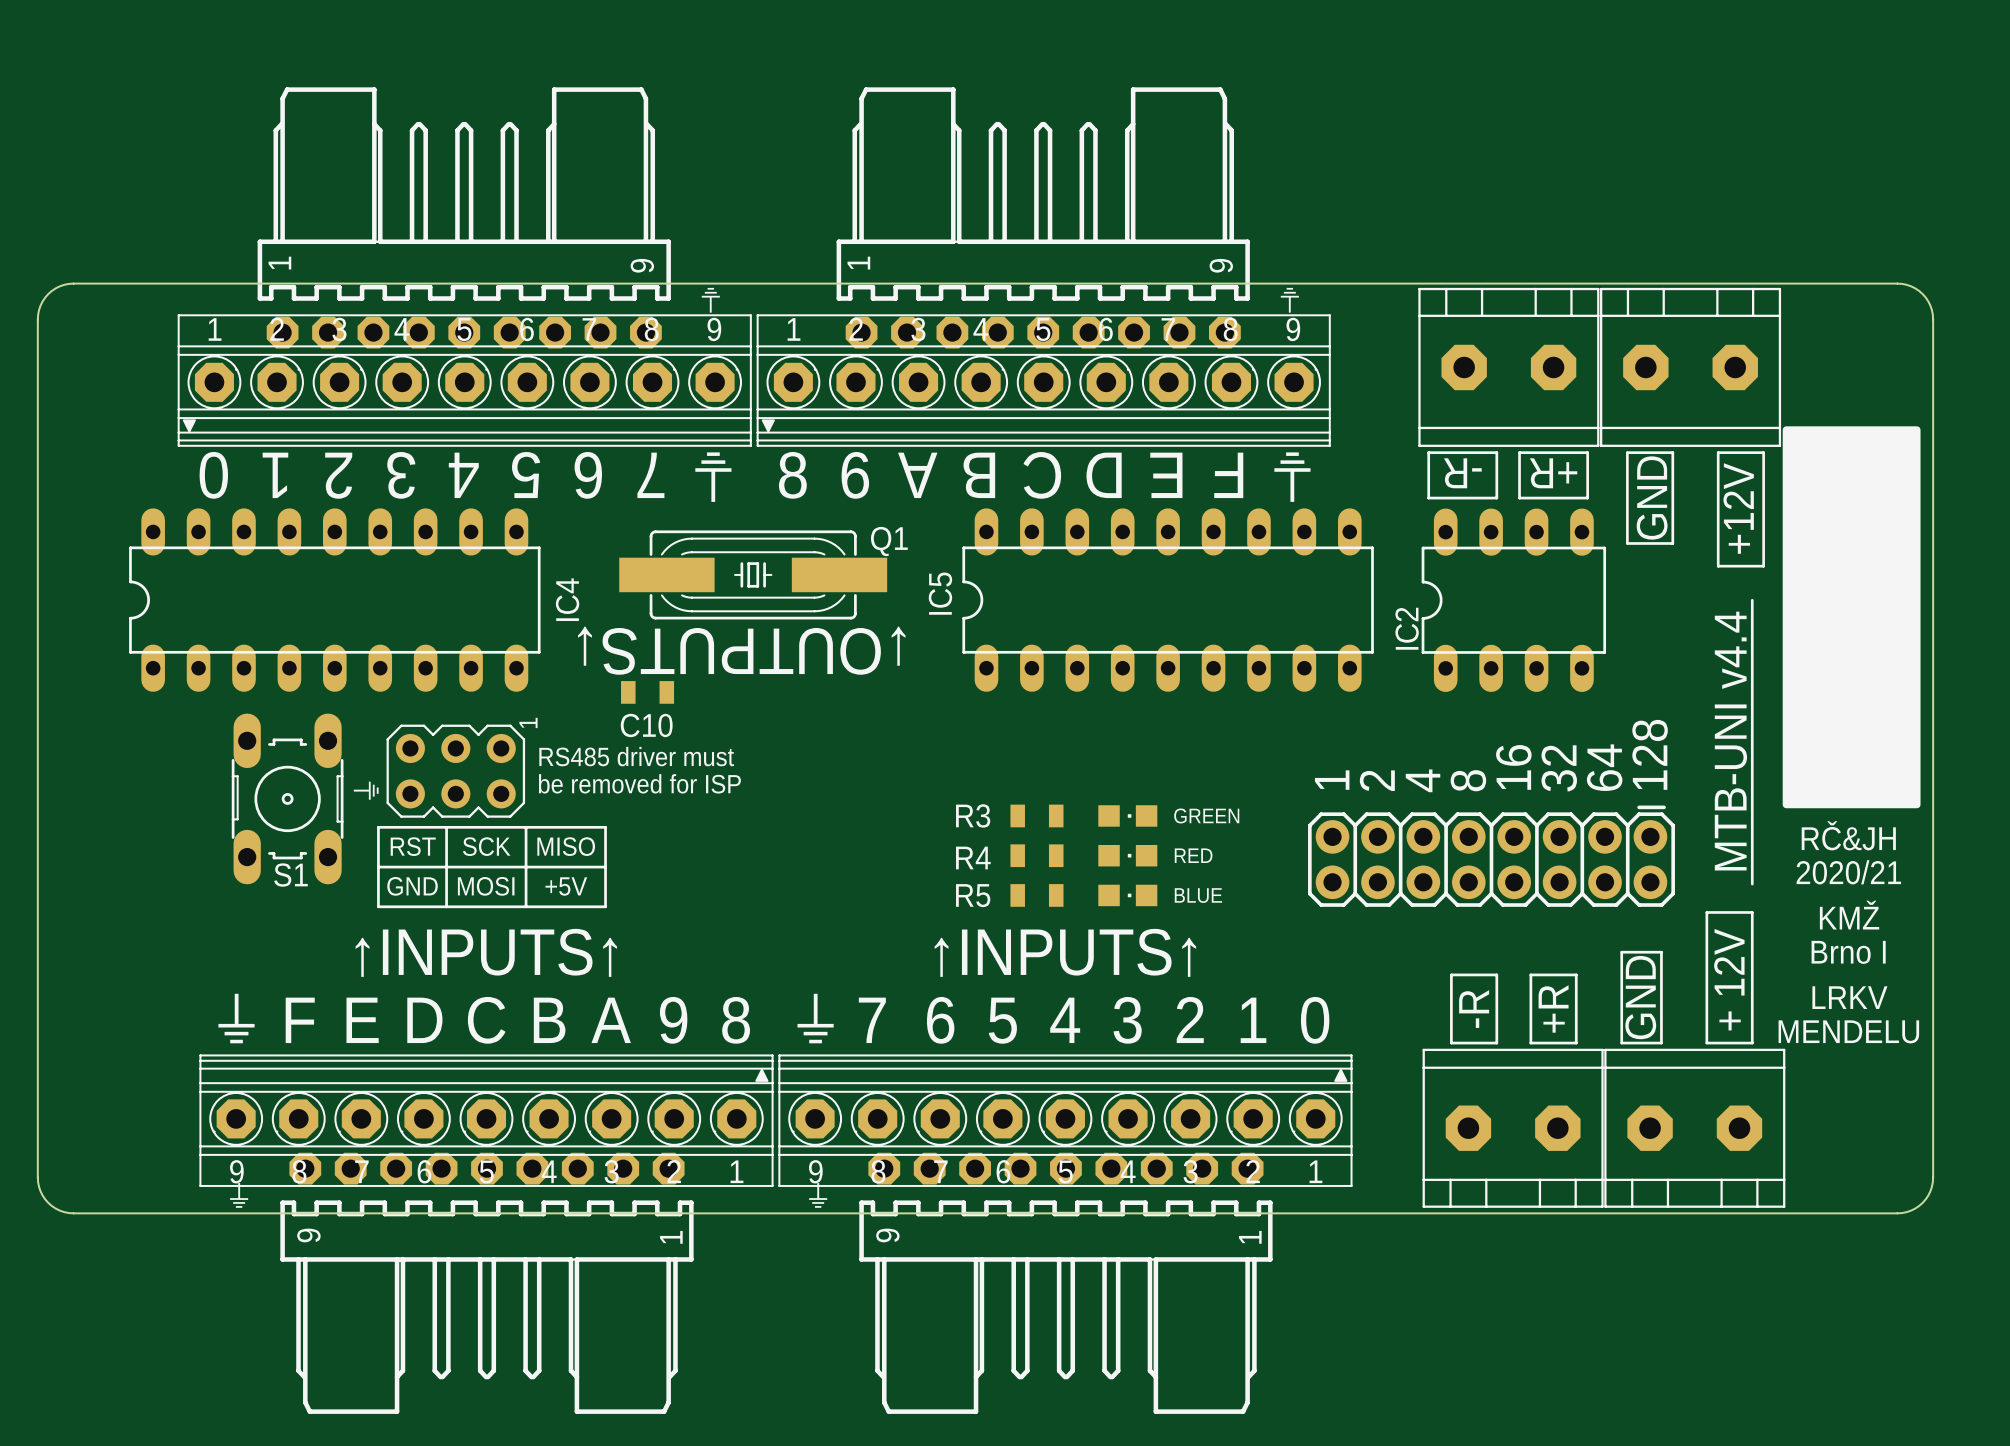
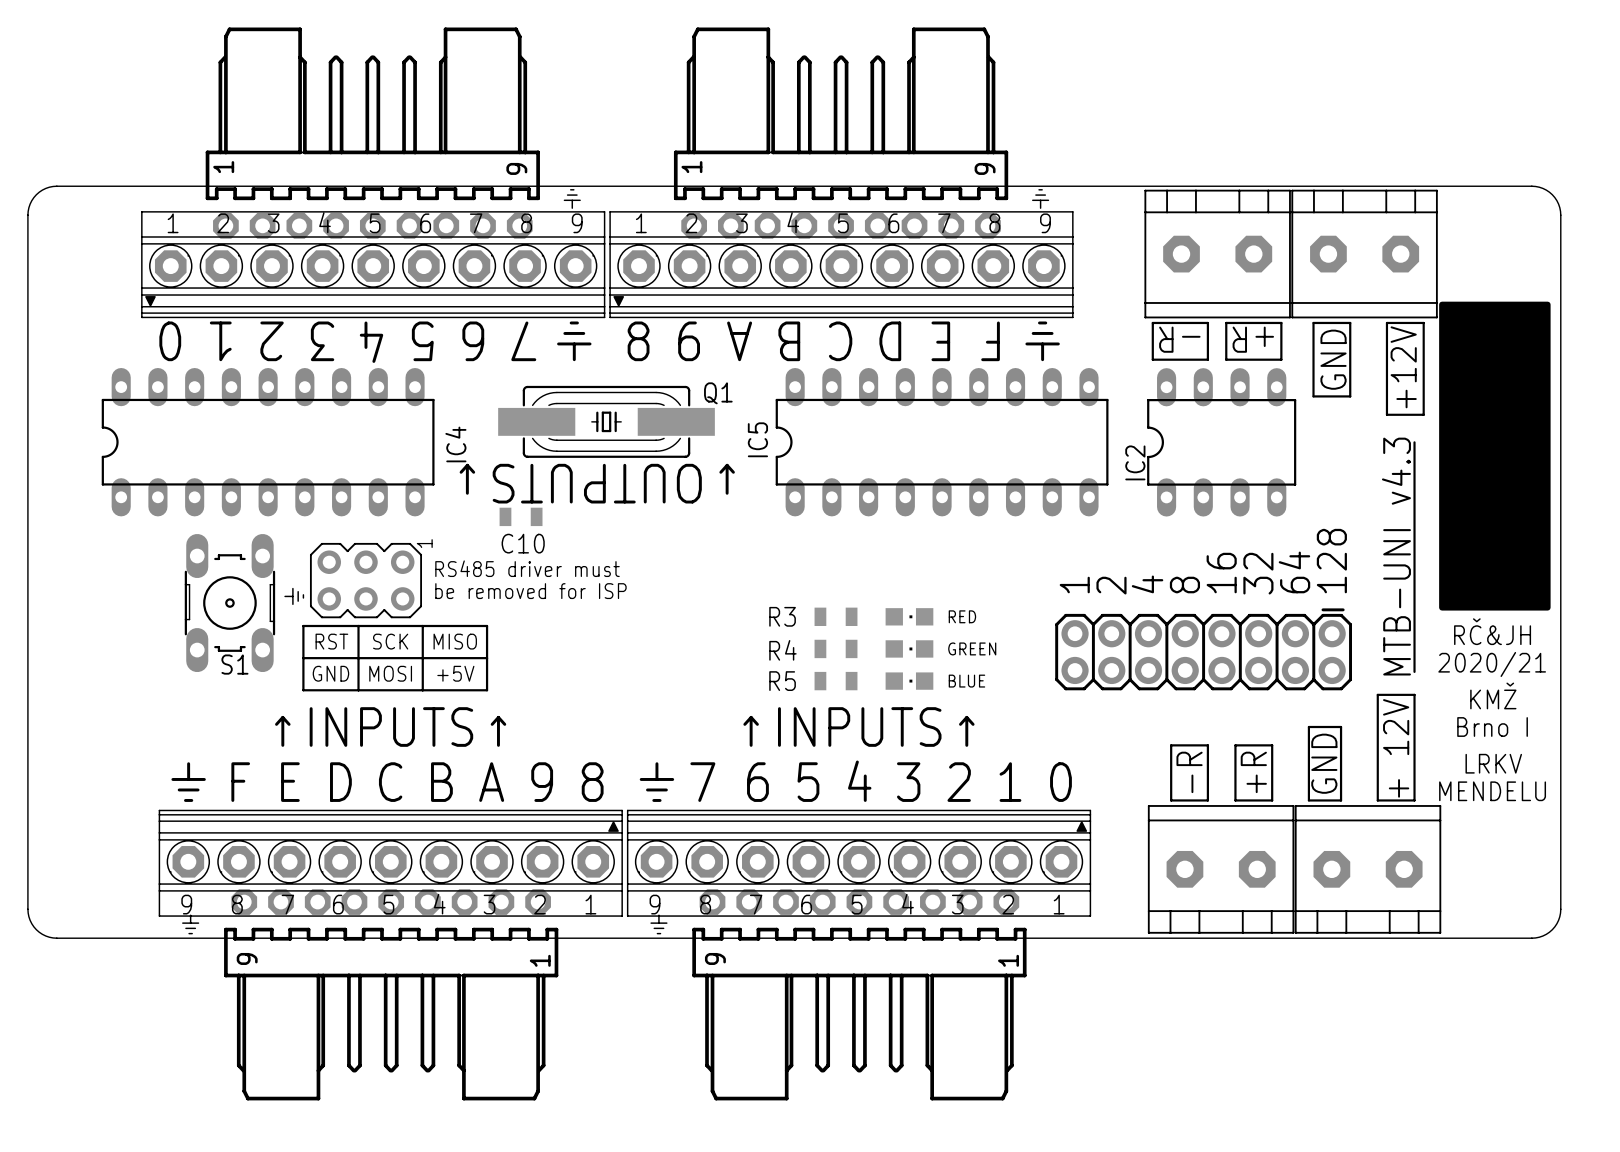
text: MTB-UNI v4.4 (1730, 741) -> MTB-UNI v4.3 (1396, 556)
text: GREEN (1206, 815) -> RED (962, 616)
text: RED (1193, 855) -> GREEN (972, 648)

